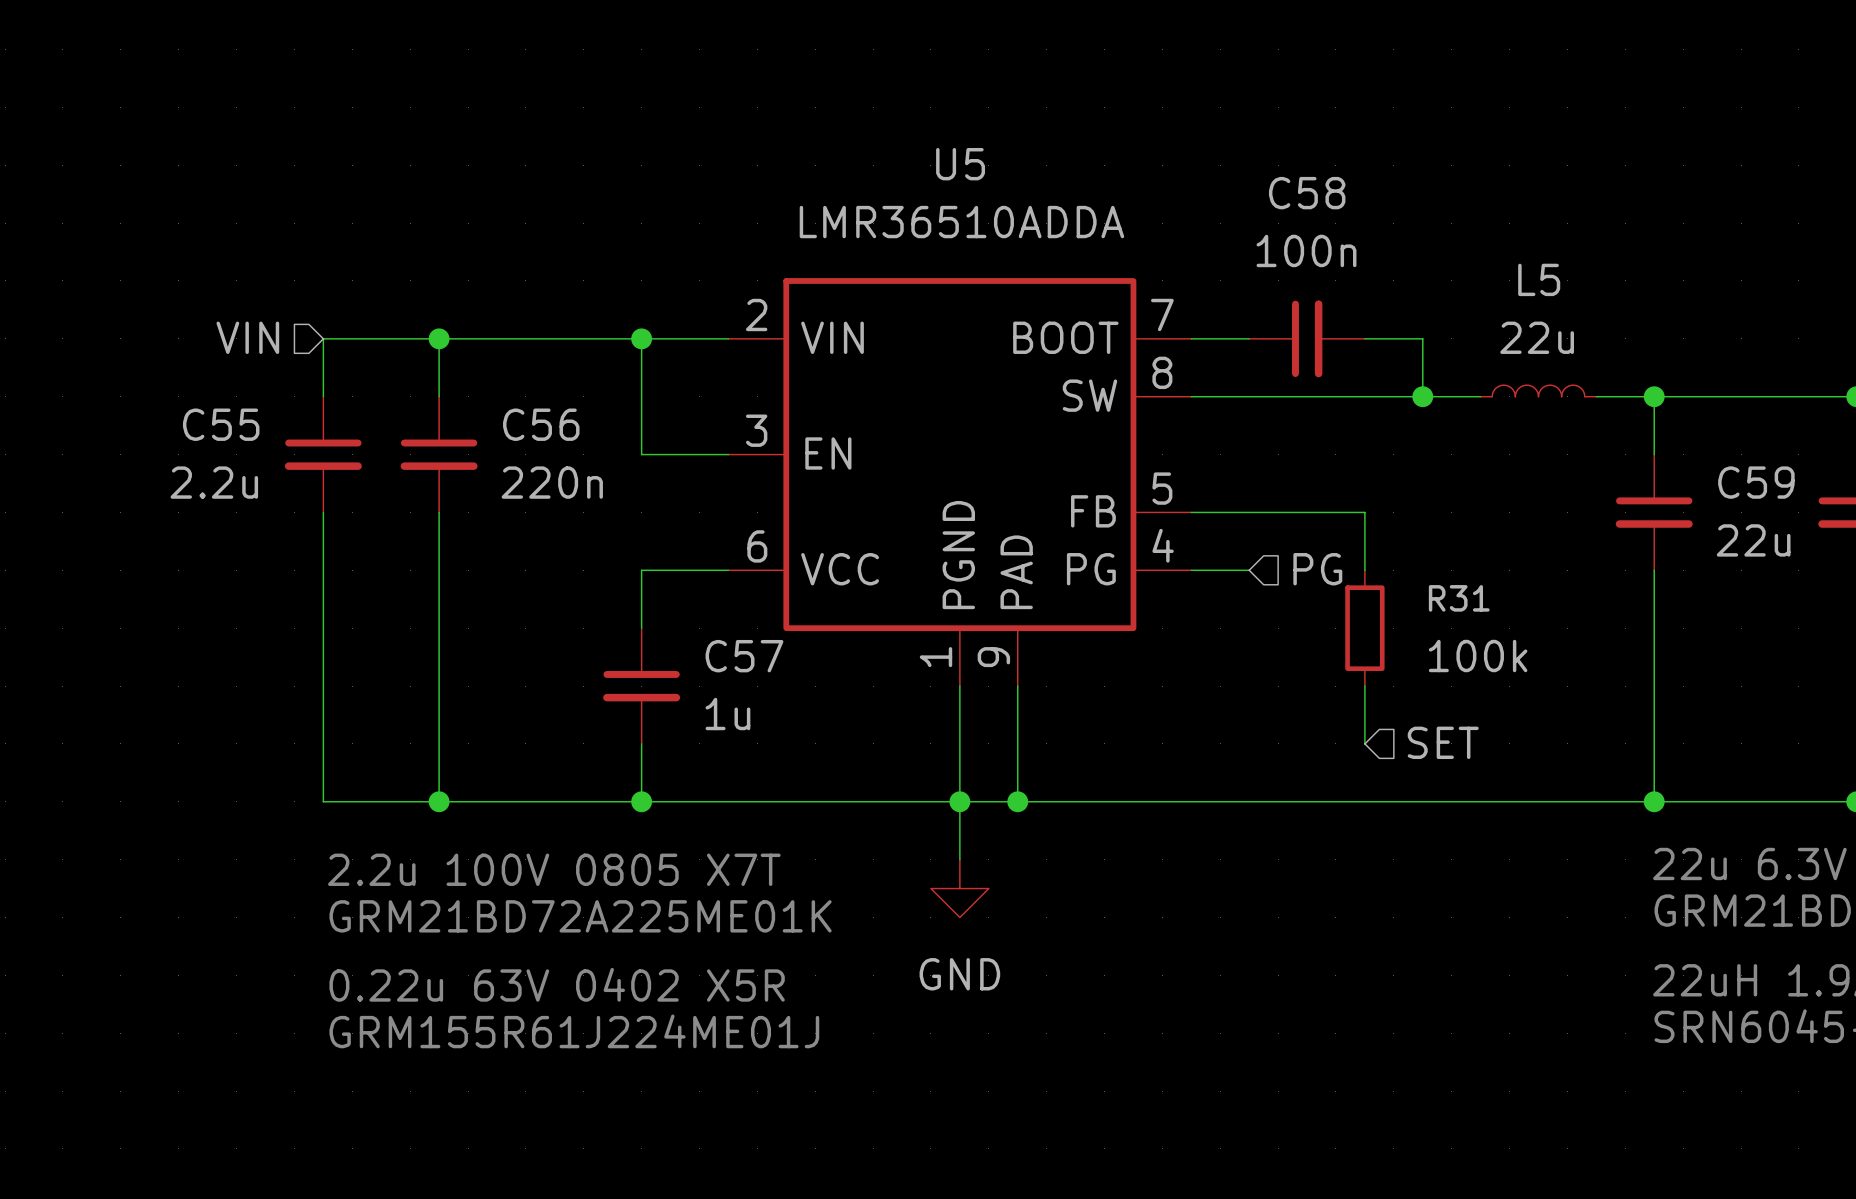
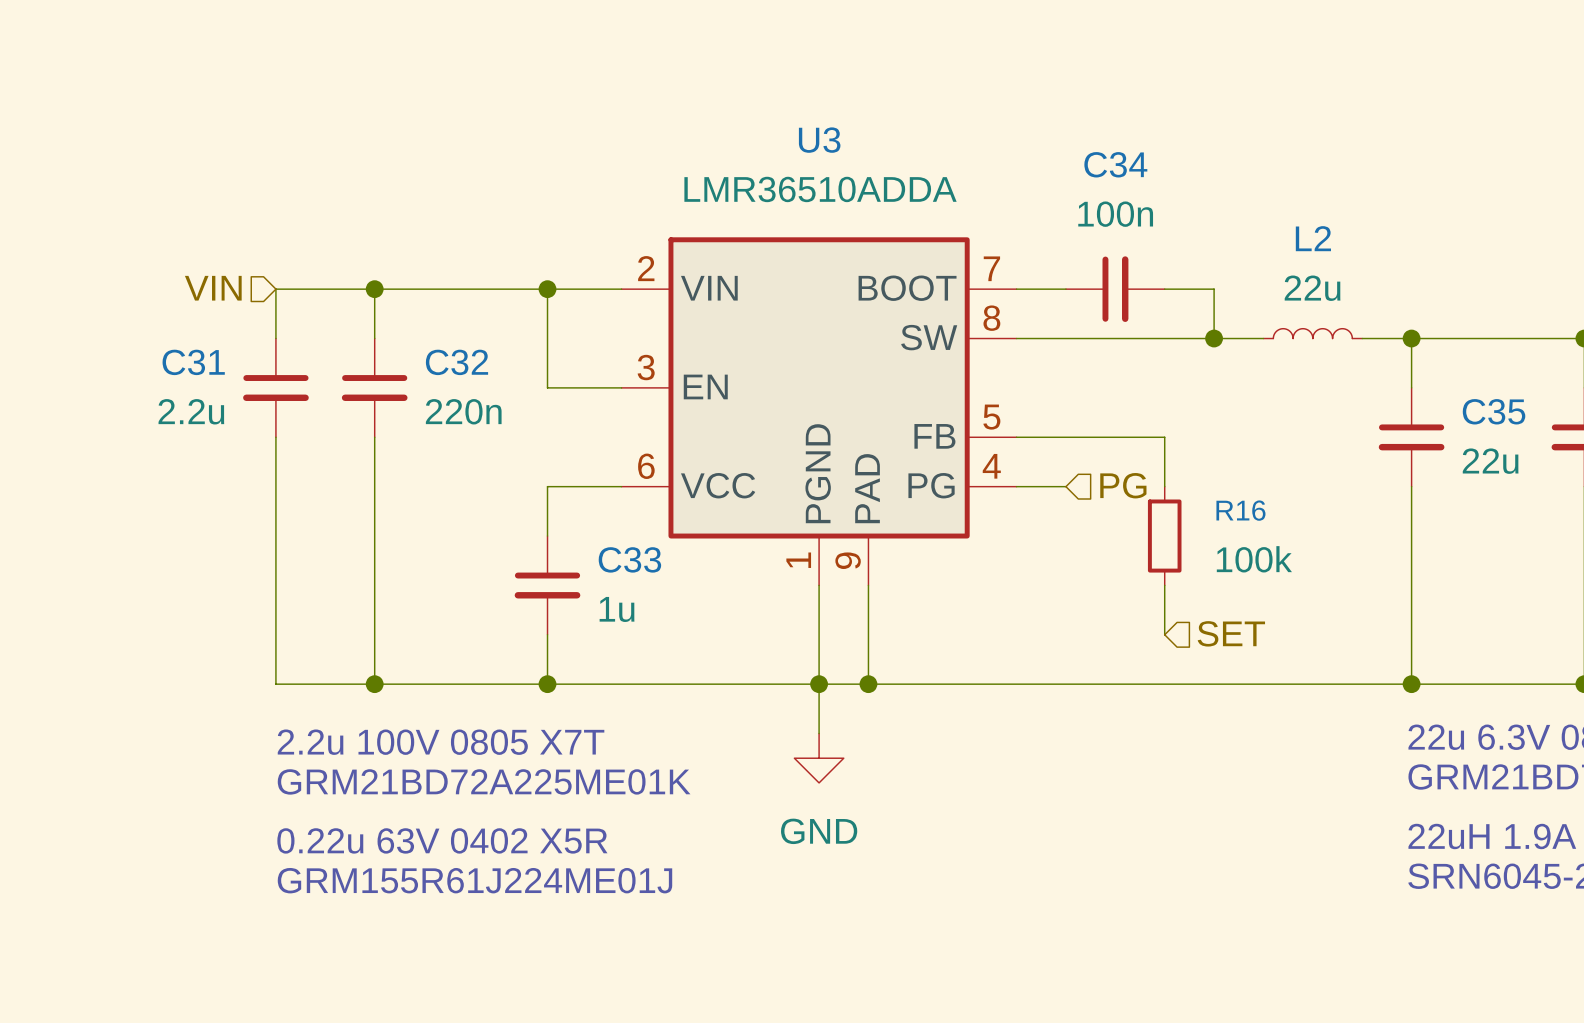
U5 name: U5 (960, 164) -> U3 (819, 140)
C58 name: C58 (1307, 193) -> C34 (1115, 164)
L5 name: L5 (1539, 279) -> L2 (1313, 238)
C55 name: C55 (221, 424) -> C31 (193, 362)
C56 name: C56 (541, 424) -> C32 (456, 362)
C59 name: C59 (1756, 482) -> C35 (1494, 411)
R31 name: R31 (1459, 598) -> R16 (1240, 510)
C57 name: C57 (744, 656) -> C33 (629, 559)

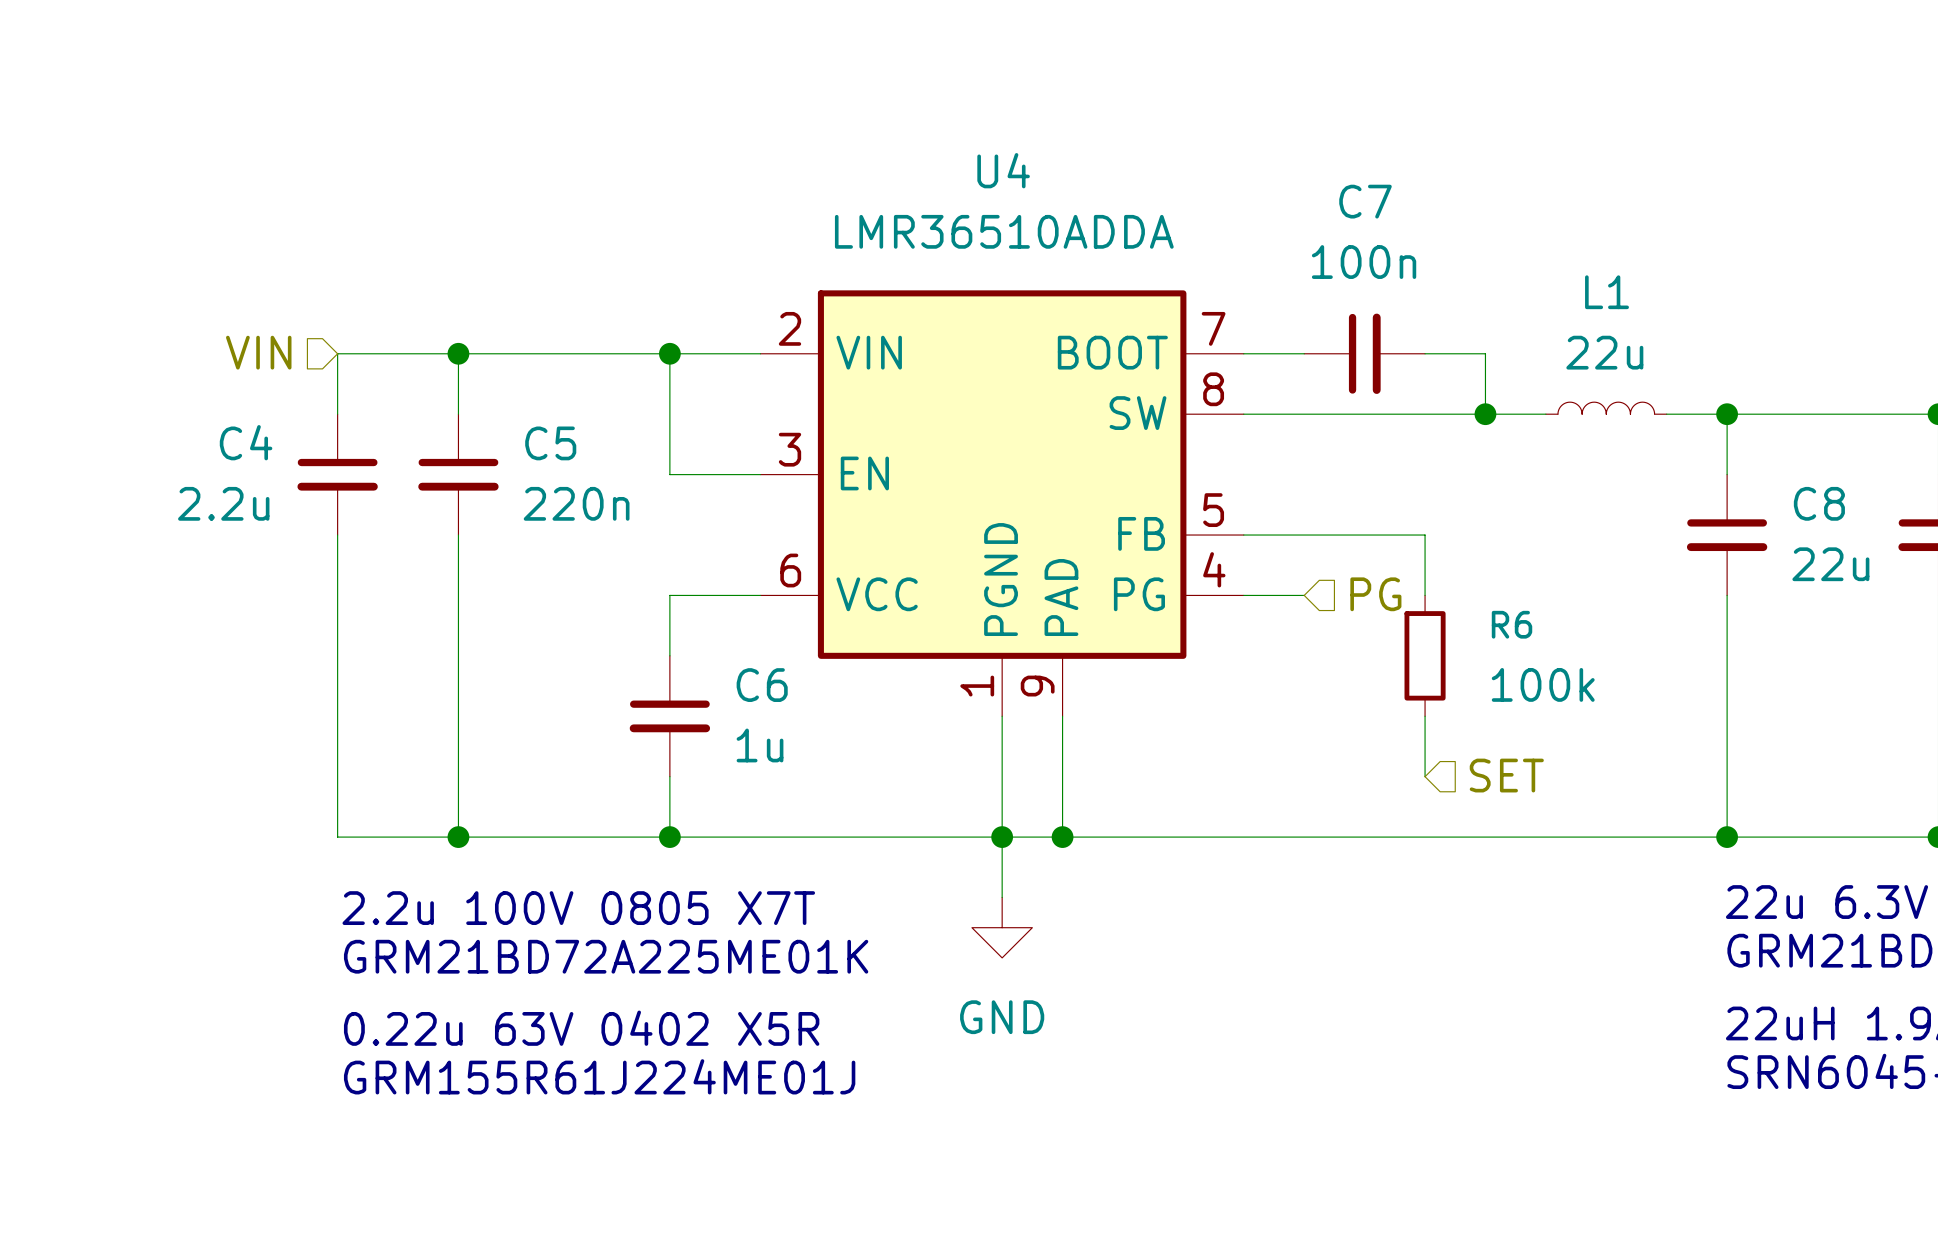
U3 name: U3 (819, 140) -> U4 (1003, 170)
C34 name: C34 (1115, 164) -> C7 (1365, 201)
L2 name: L2 (1313, 238) -> L1 (1607, 292)
C31 name: C31 (193, 362) -> C4 (246, 442)
C32 name: C32 (456, 362) -> C5 (550, 443)
C35 name: C35 (1494, 411) -> C8 (1819, 503)
R16 name: R16 (1240, 510) -> R6 (1512, 624)
C33 name: C33 (629, 559) -> C6 (762, 685)

